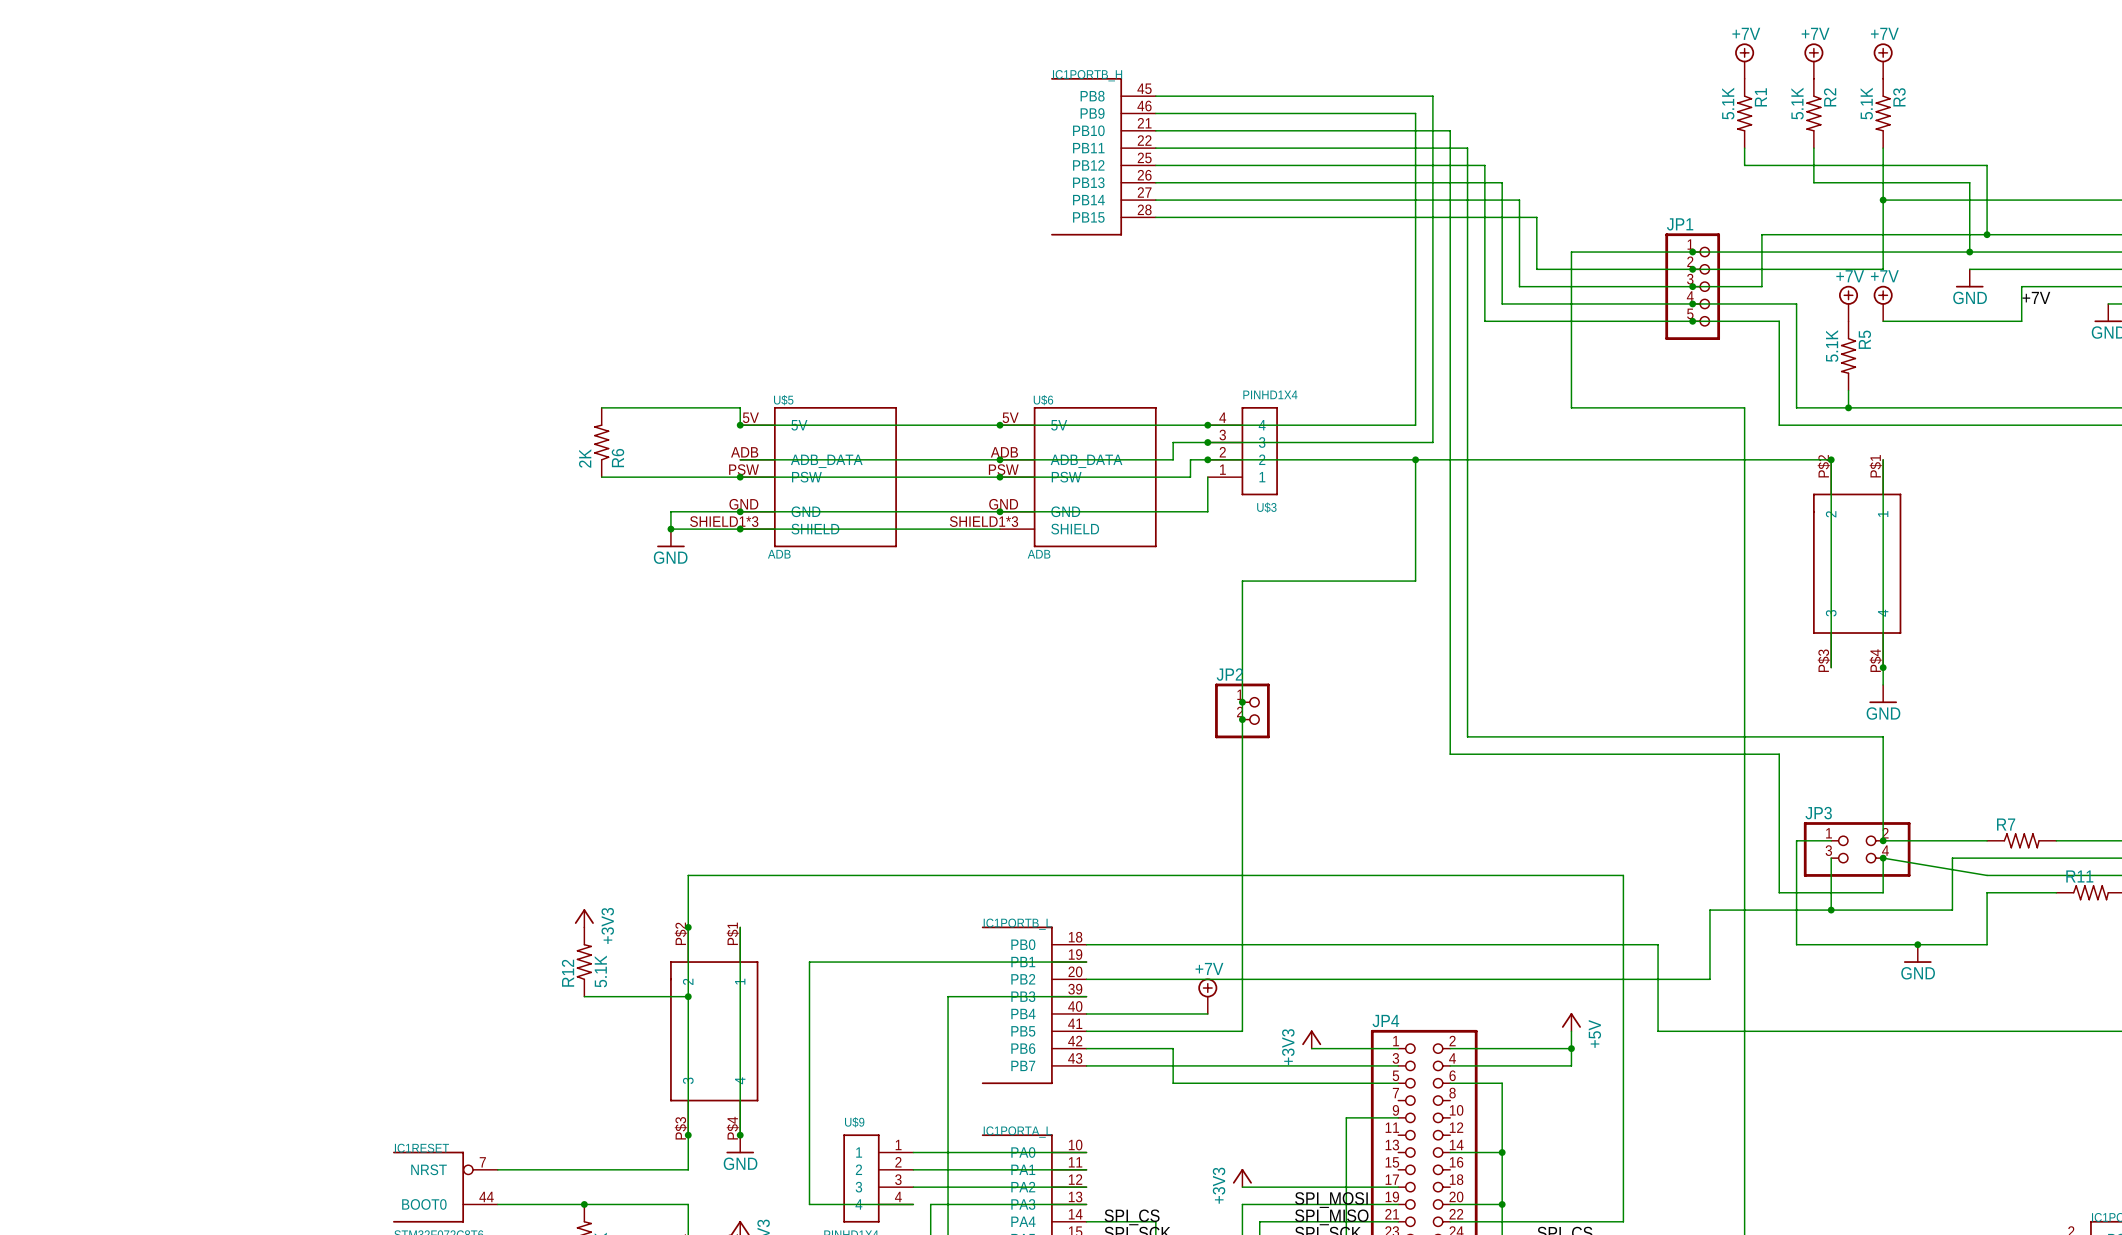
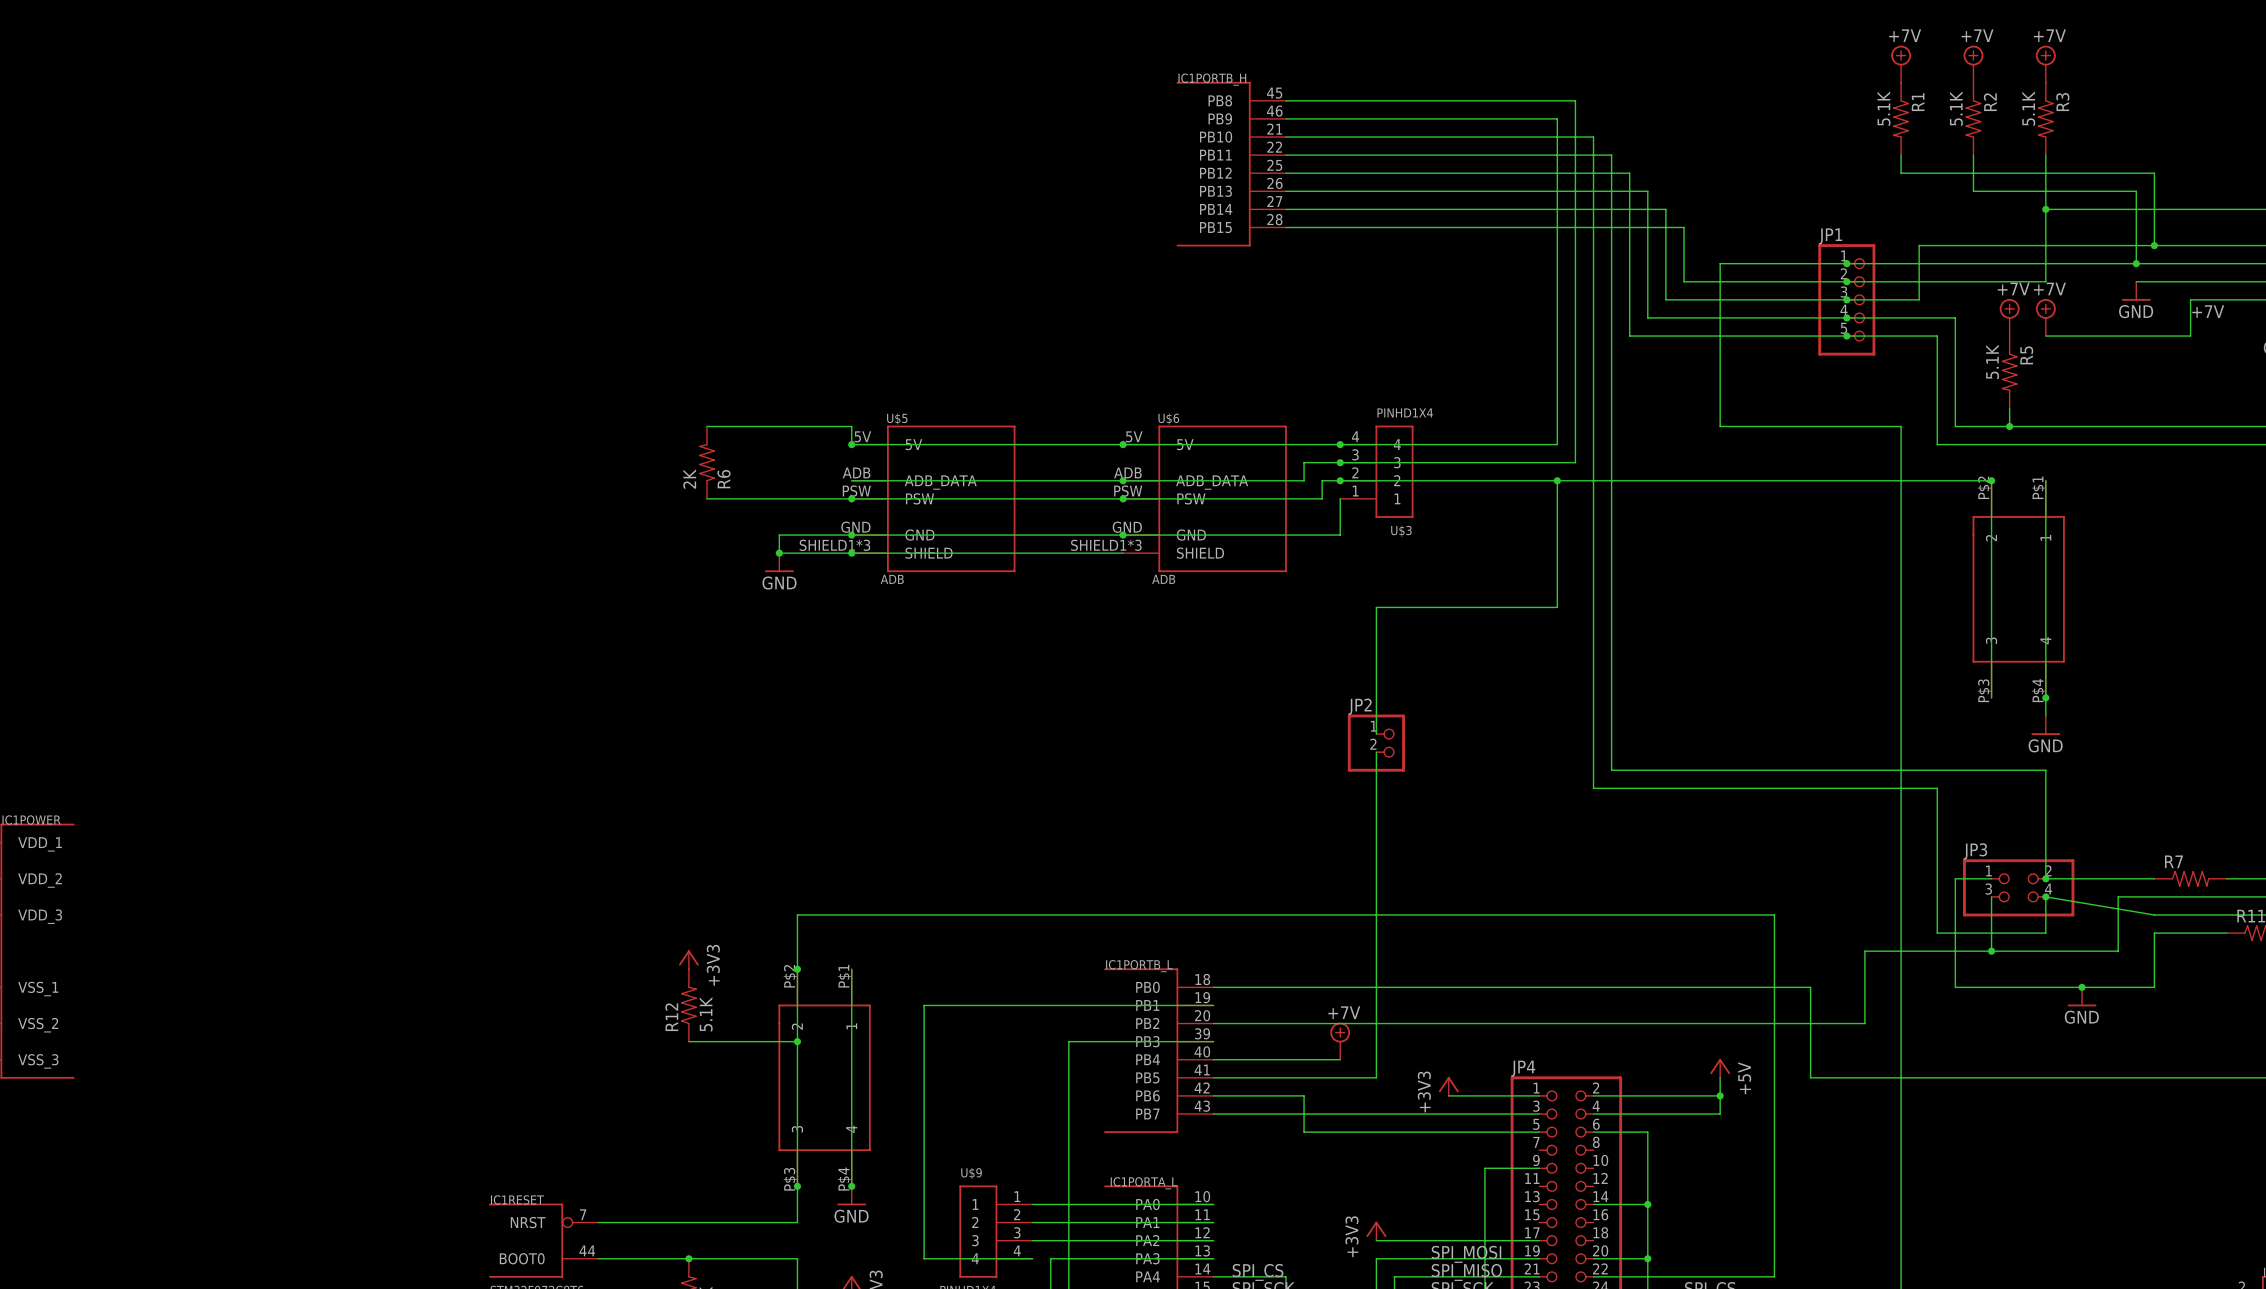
wire: (1242, 702) (1242, 719) -> none
junction: (1242, 702) -> none
junction: (1242, 719) -> none

